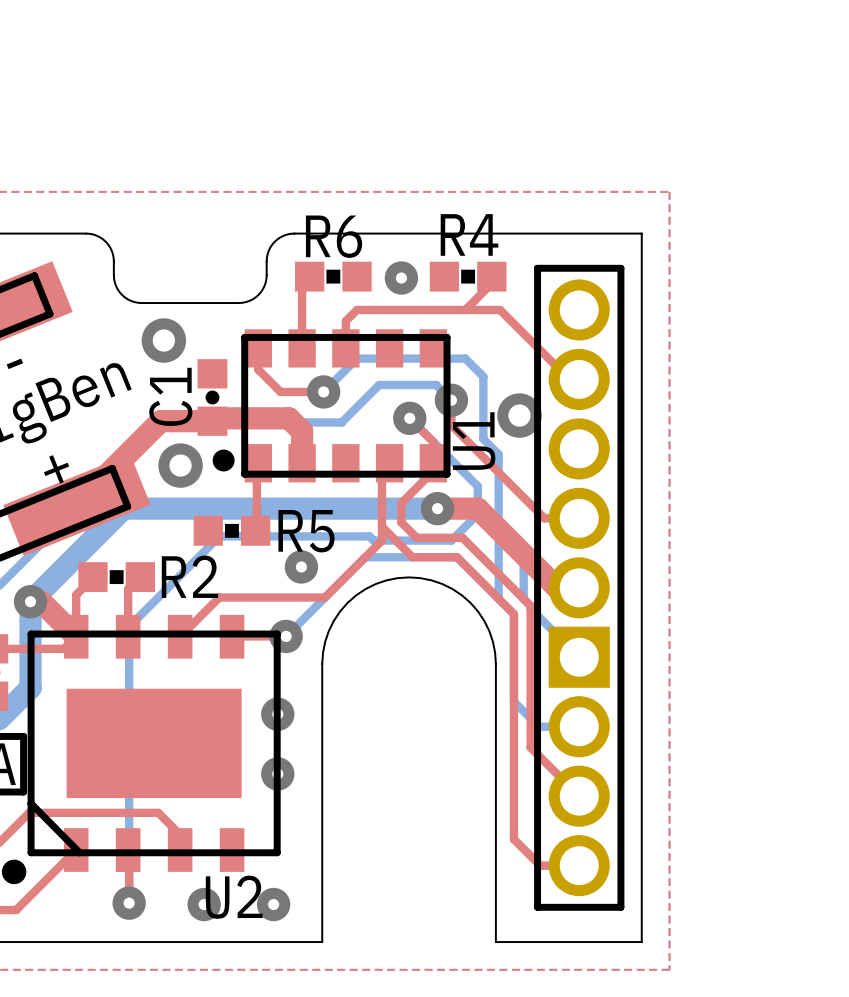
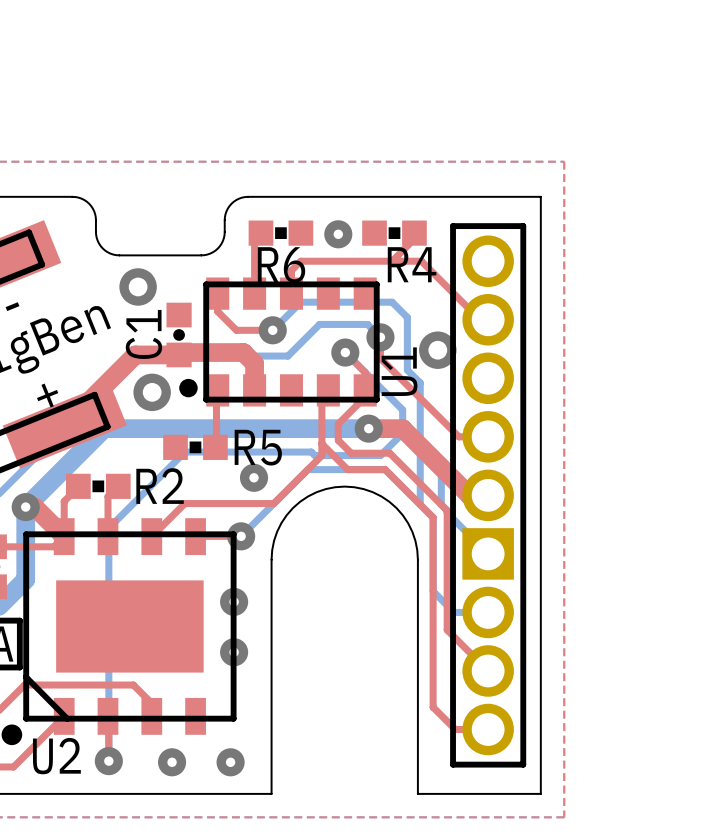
R4 name position: R4 (469, 234) -> R4 (412, 264)
R6 name position: R6 (334, 236) -> R6 (281, 265)
U2 name position: U2 (234, 897) -> U2 (56, 756)

